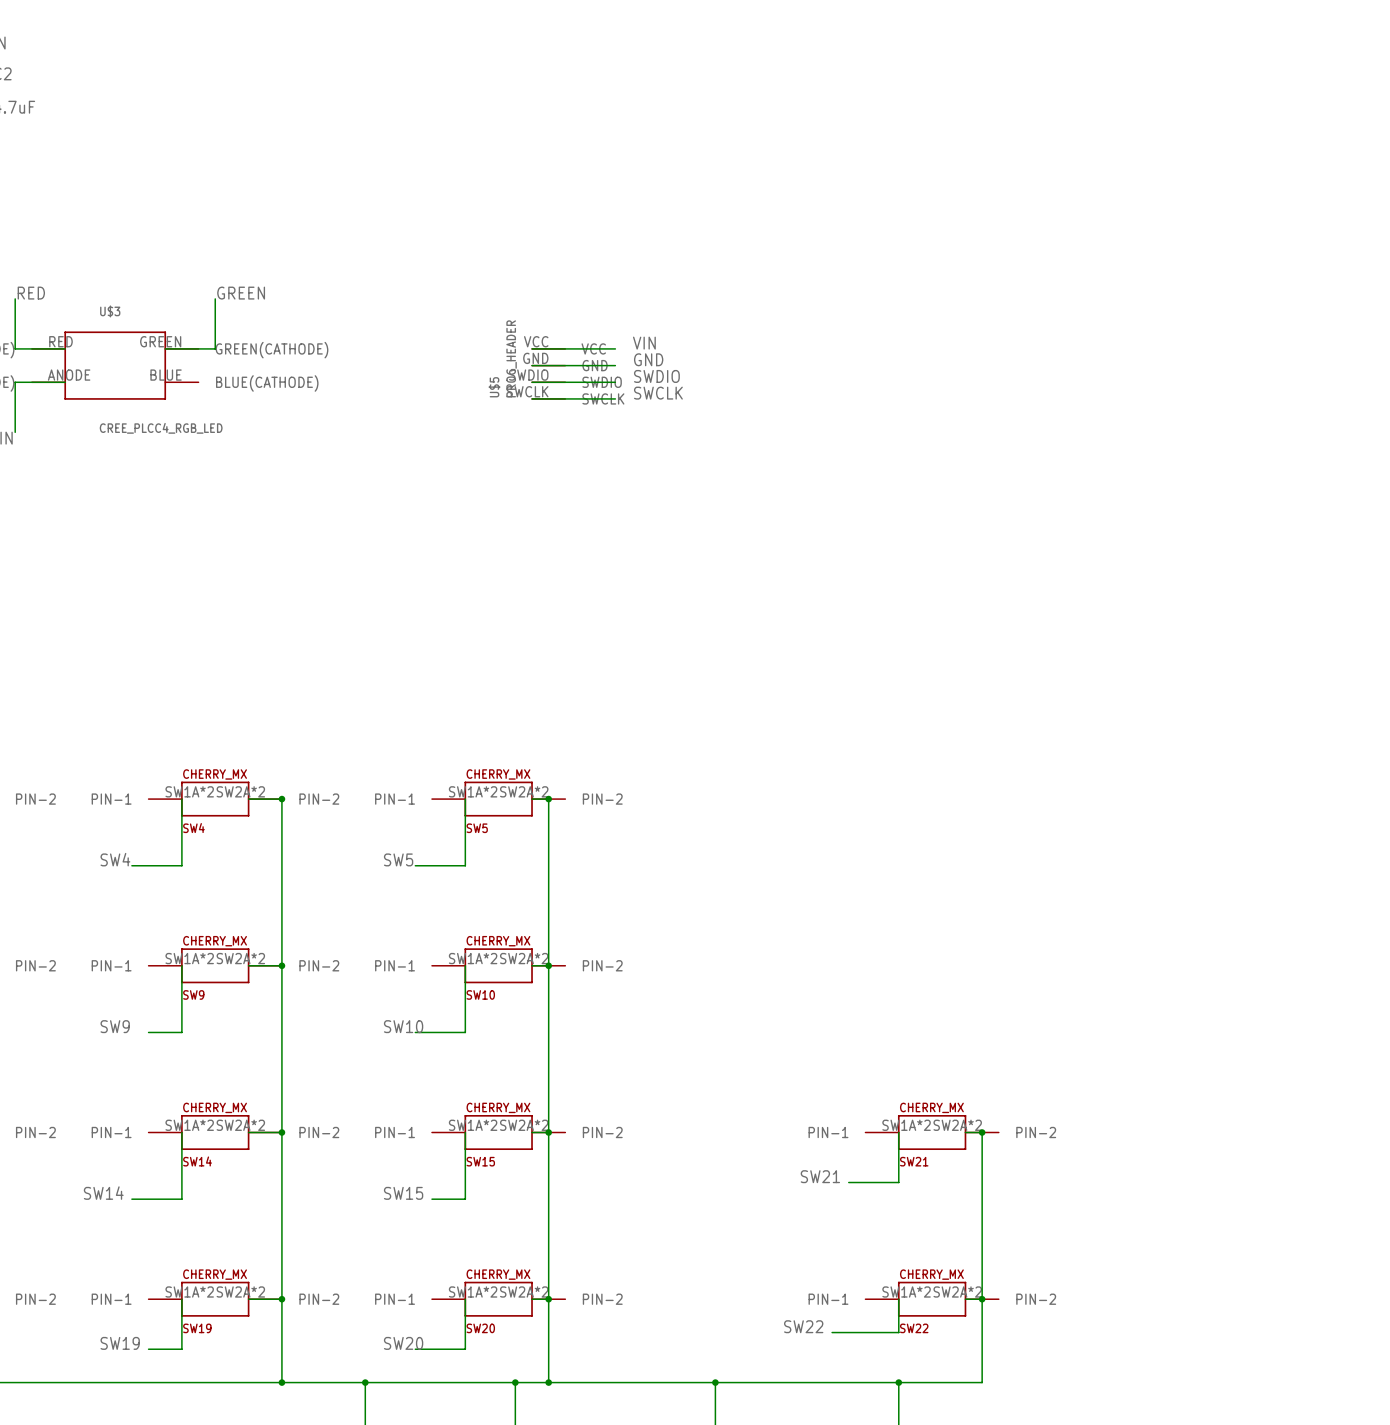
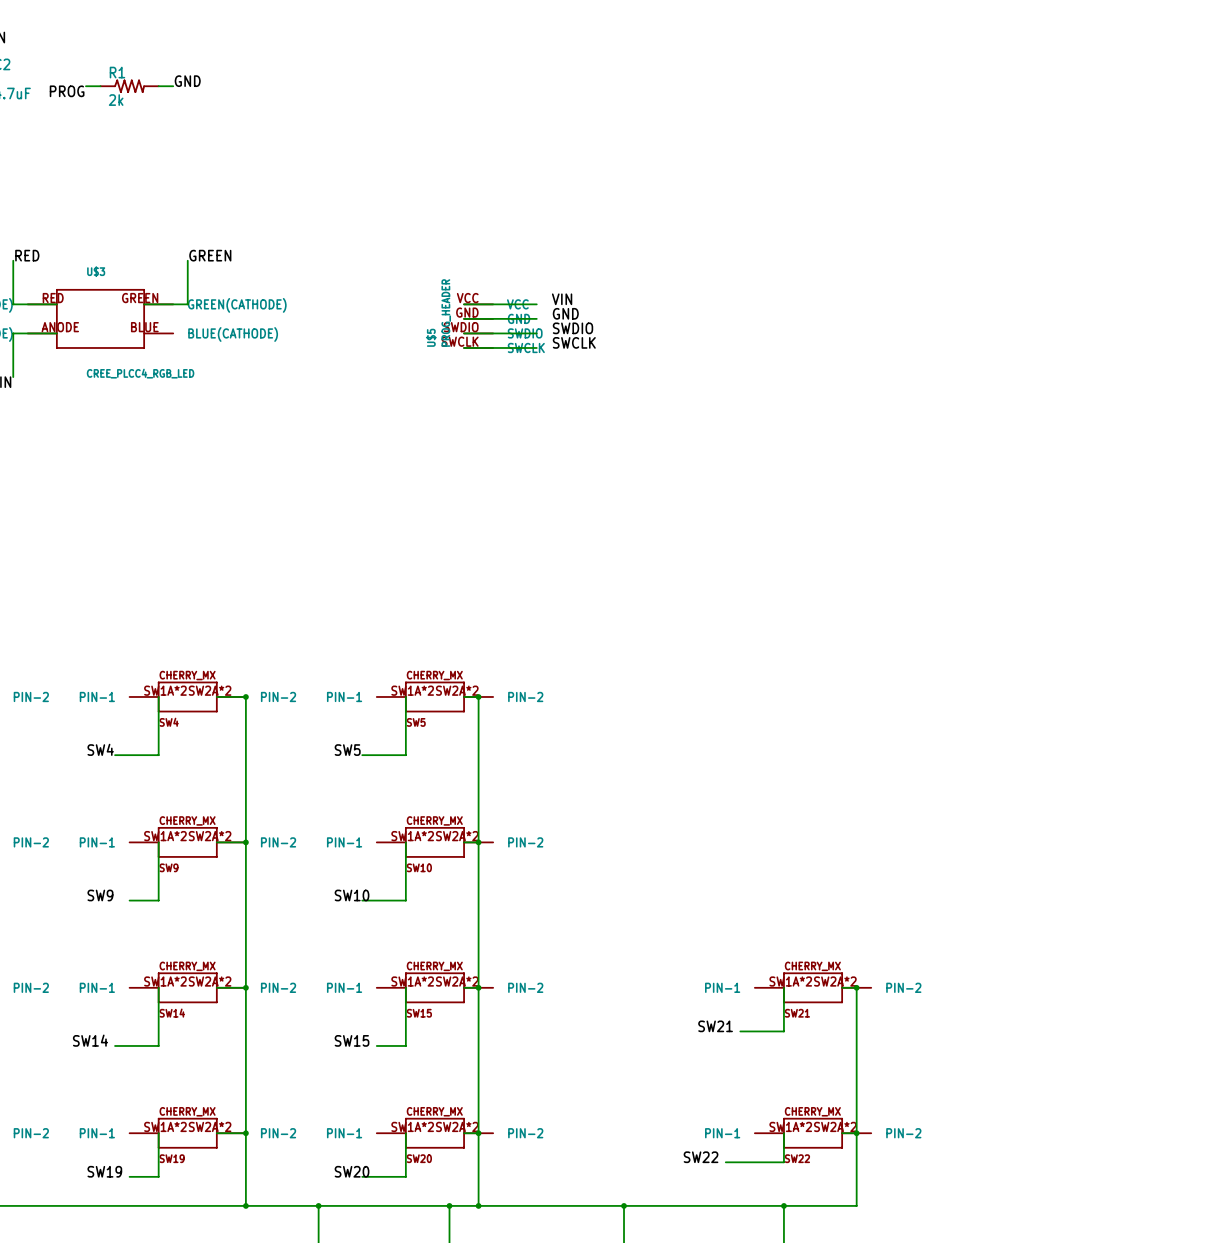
label: none -> GND (187, 81)
wire: none -> (85, 86) (100, 86)
R1: none -> 2k (129, 86)
wire: none -> (158, 86) (173, 86)
label: none -> PROG (67, 91)

